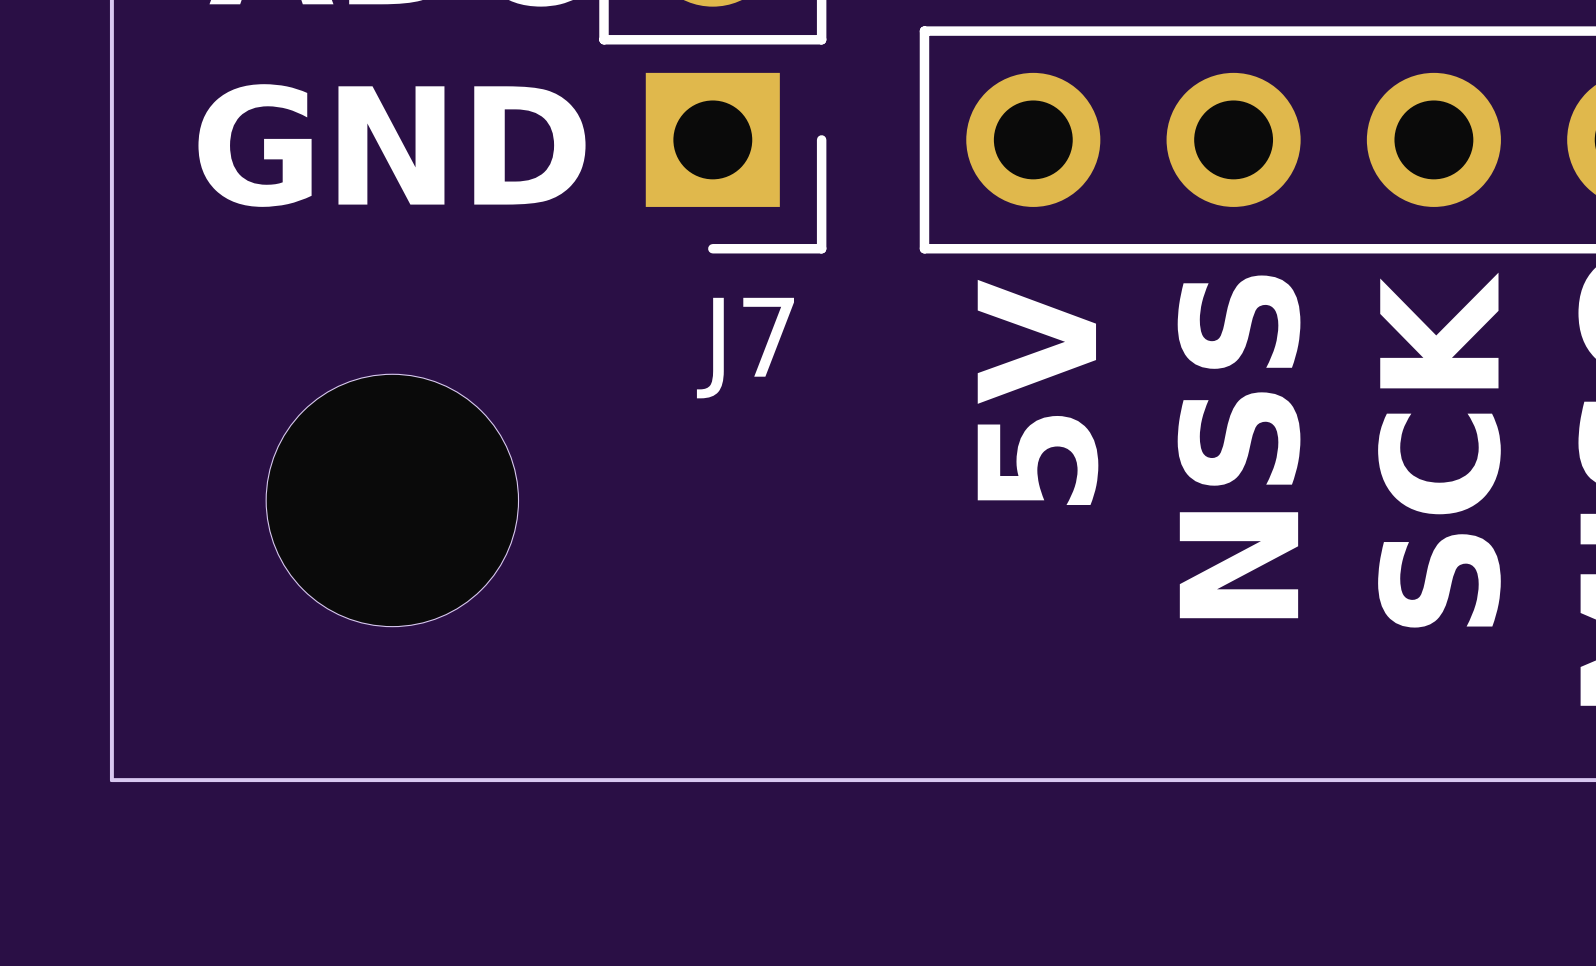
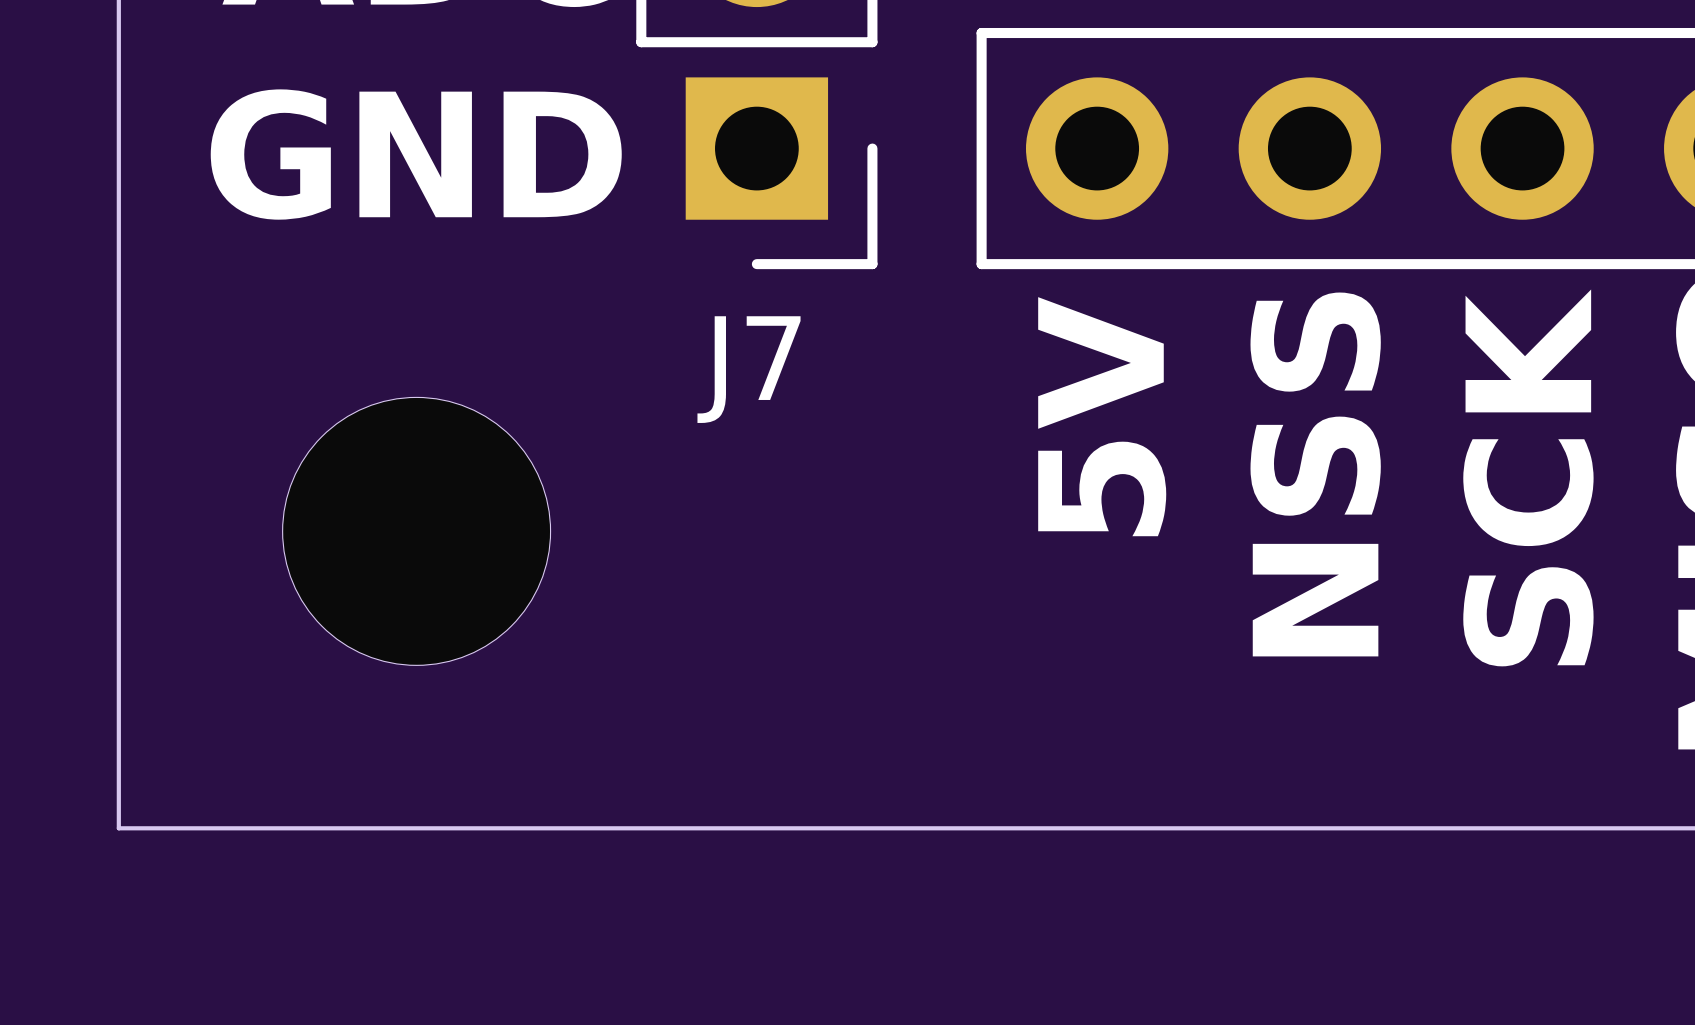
J7 name position: J7 (745, 348) -> J7 (749, 369)

